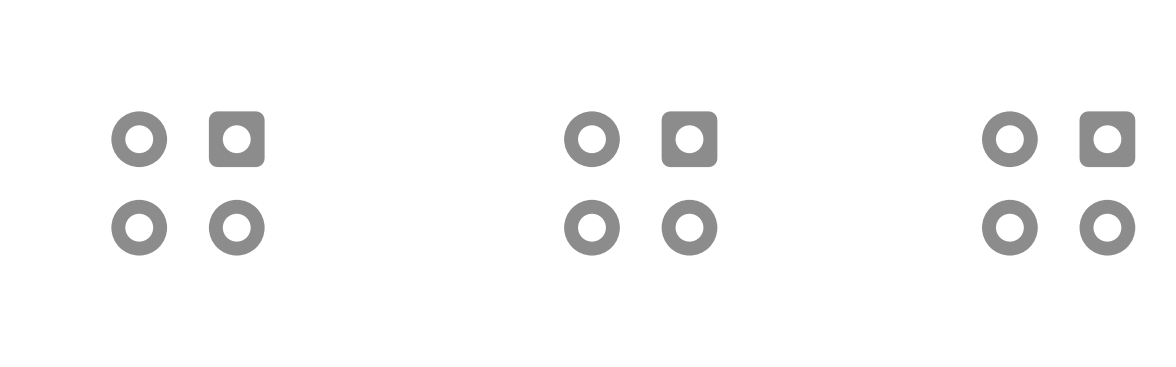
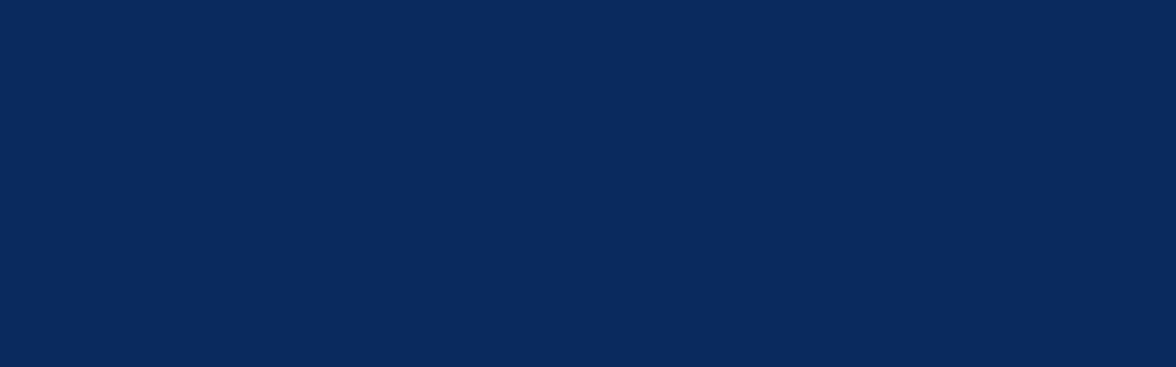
part: (187, 183) -> none
part: (640, 183) -> none
part: (1058, 183) -> none

